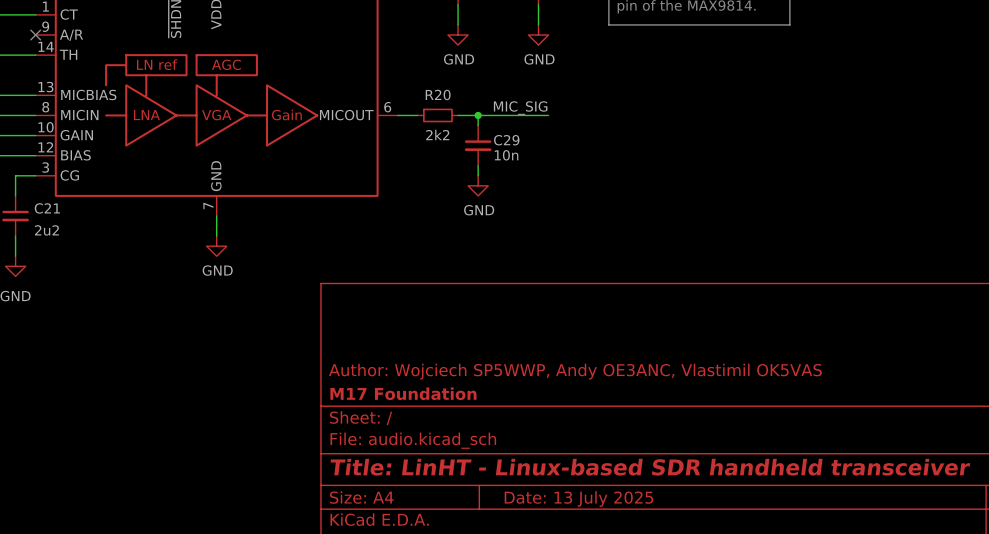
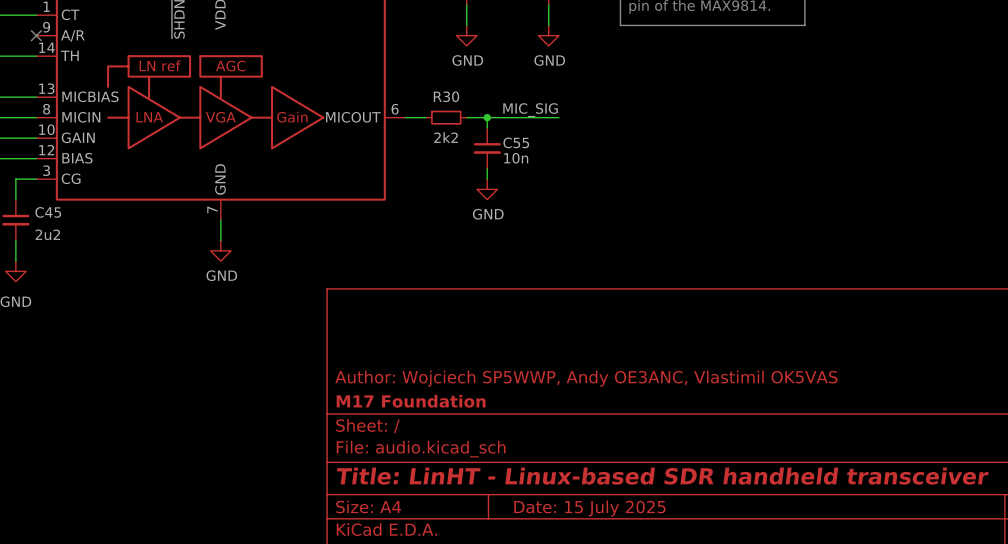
R20 name: R20 (438, 94) -> R30 (446, 96)
C29 name: C29 (506, 140) -> C55 (516, 142)
C21 name: C21 (47, 208) -> C45 (48, 212)
title block: Date: 13 July 2025 (578, 499) -> Date: 15 July 2025 (589, 508)

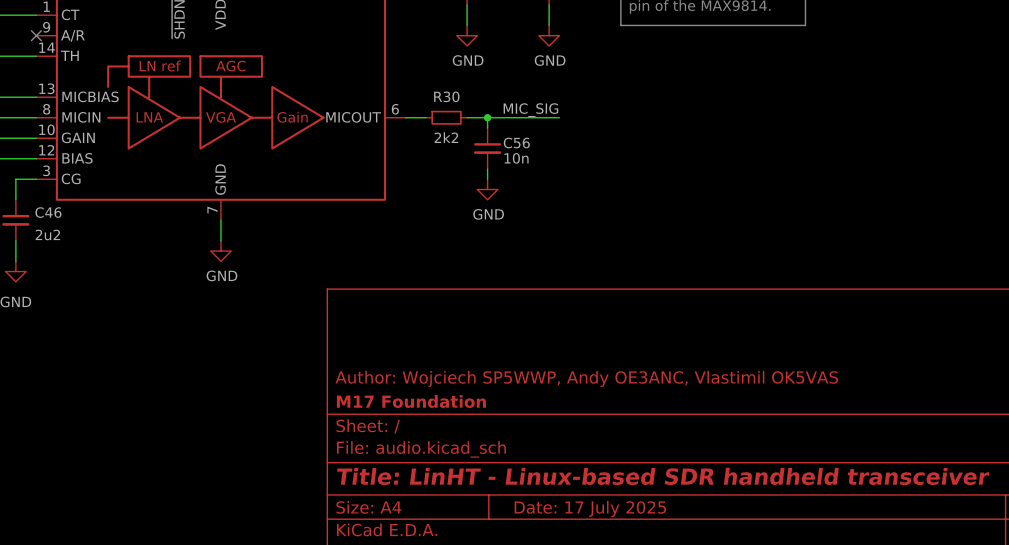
C55 name: C55 (516, 142) -> C56 (516, 143)
C45 name: C45 (48, 212) -> C46 (48, 212)
title block: Date: 15 July 2025 (589, 508) -> Date: 17 July 2025 (590, 508)

